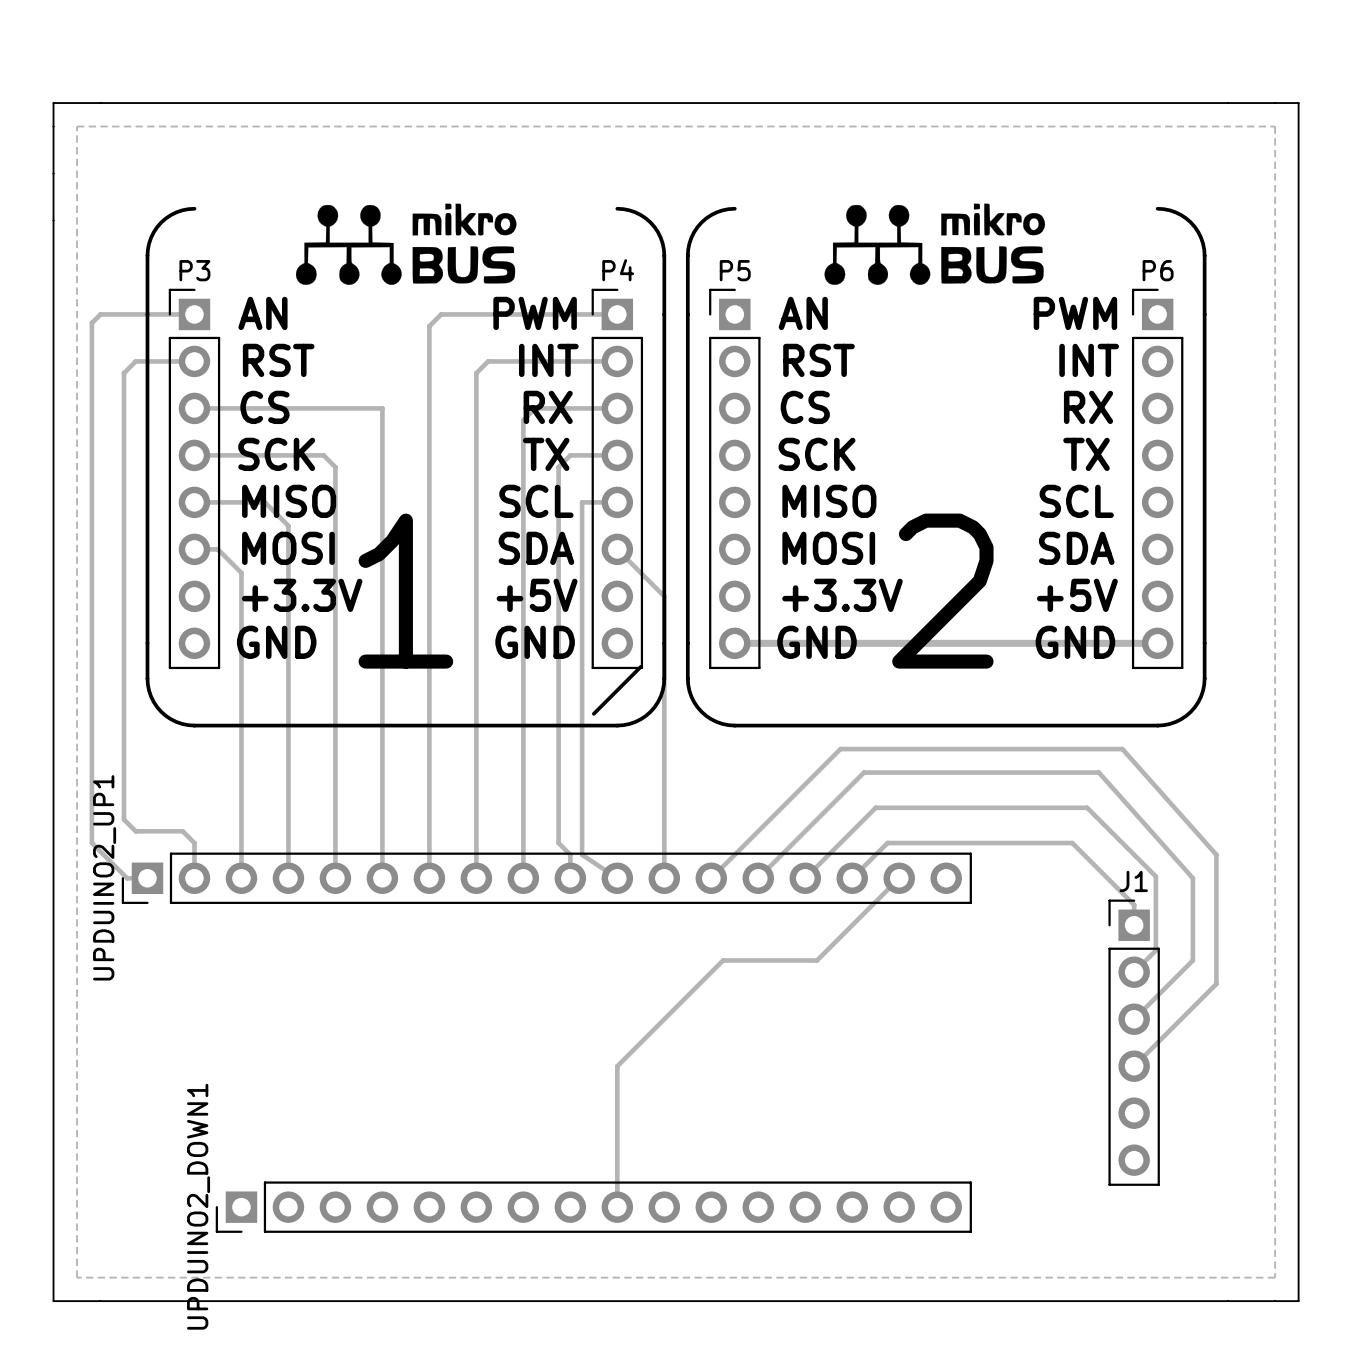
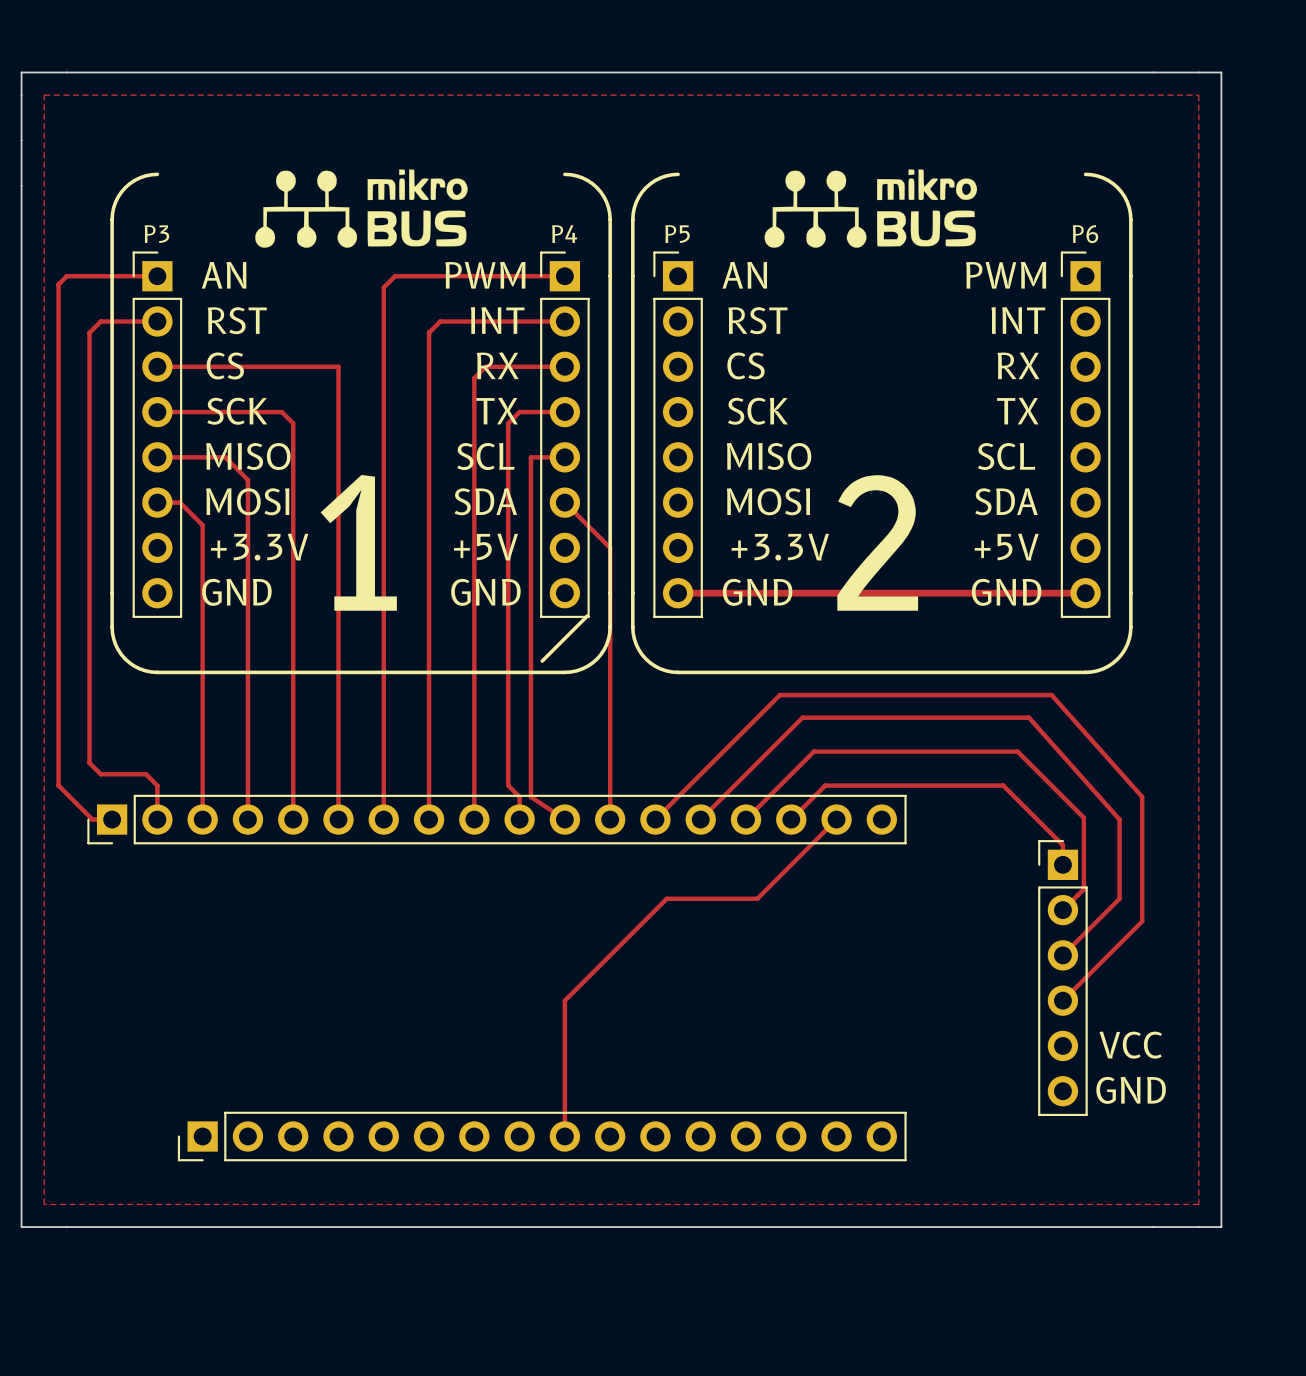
UPDUINO2_UP1 name: UPDUINO2_UP1 (104, 877) -> none
J1 name: J1 (1133, 881) -> none
text: none -> VCC (1130, 1045)
text: none -> GND (1131, 1090)
UPDUINO2_DOWN1 name: UPDUINO2_DOWN1 (198, 1206) -> none

